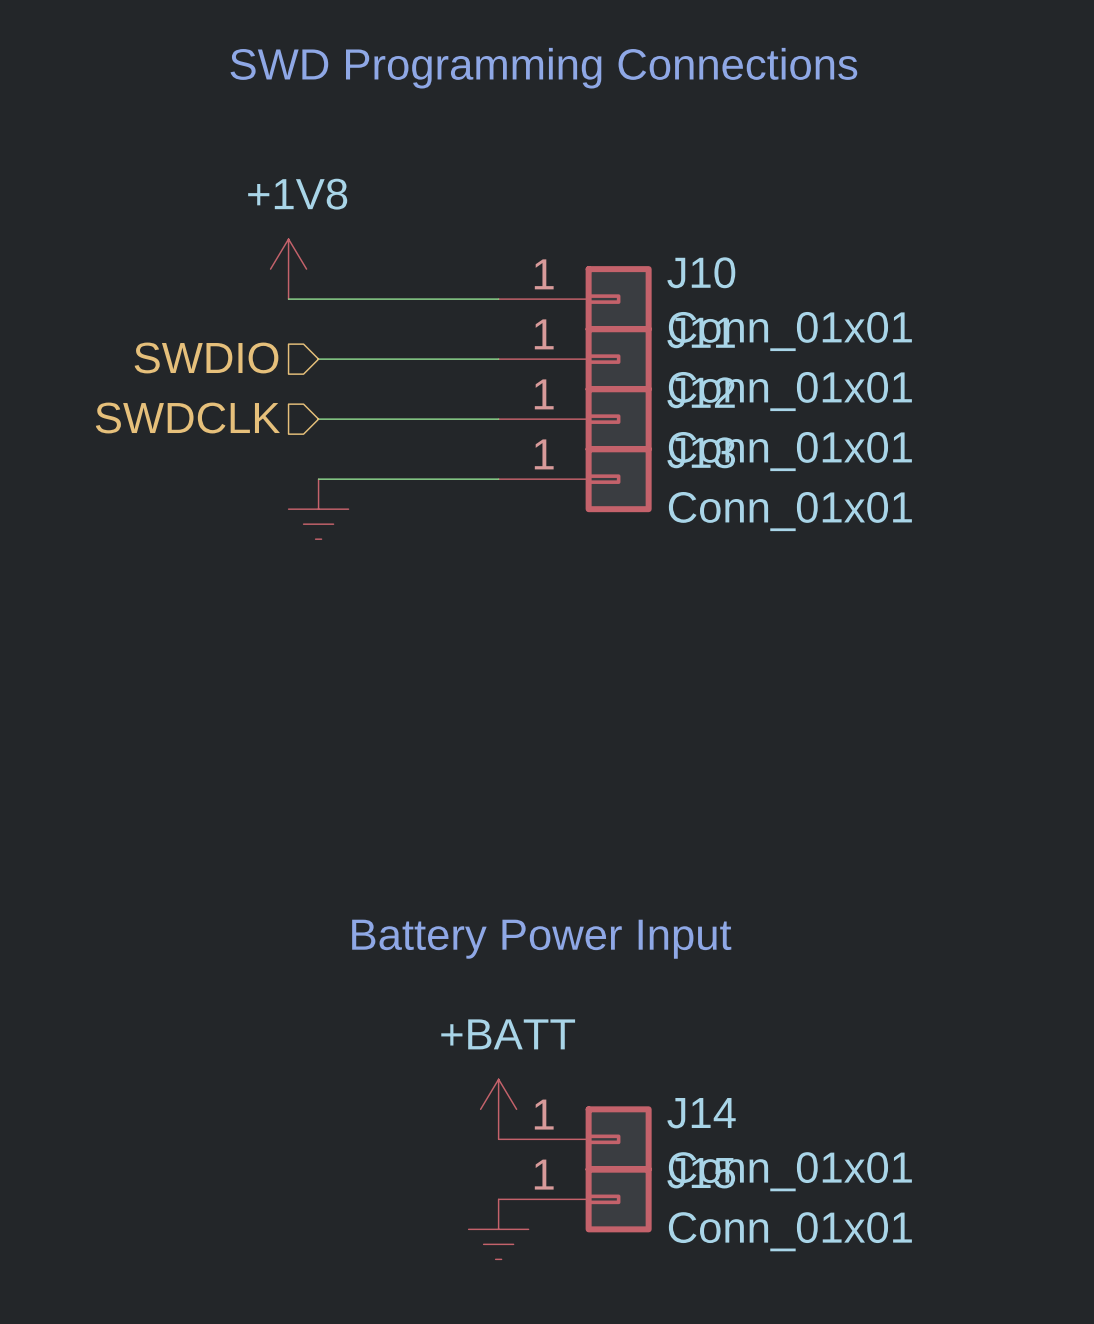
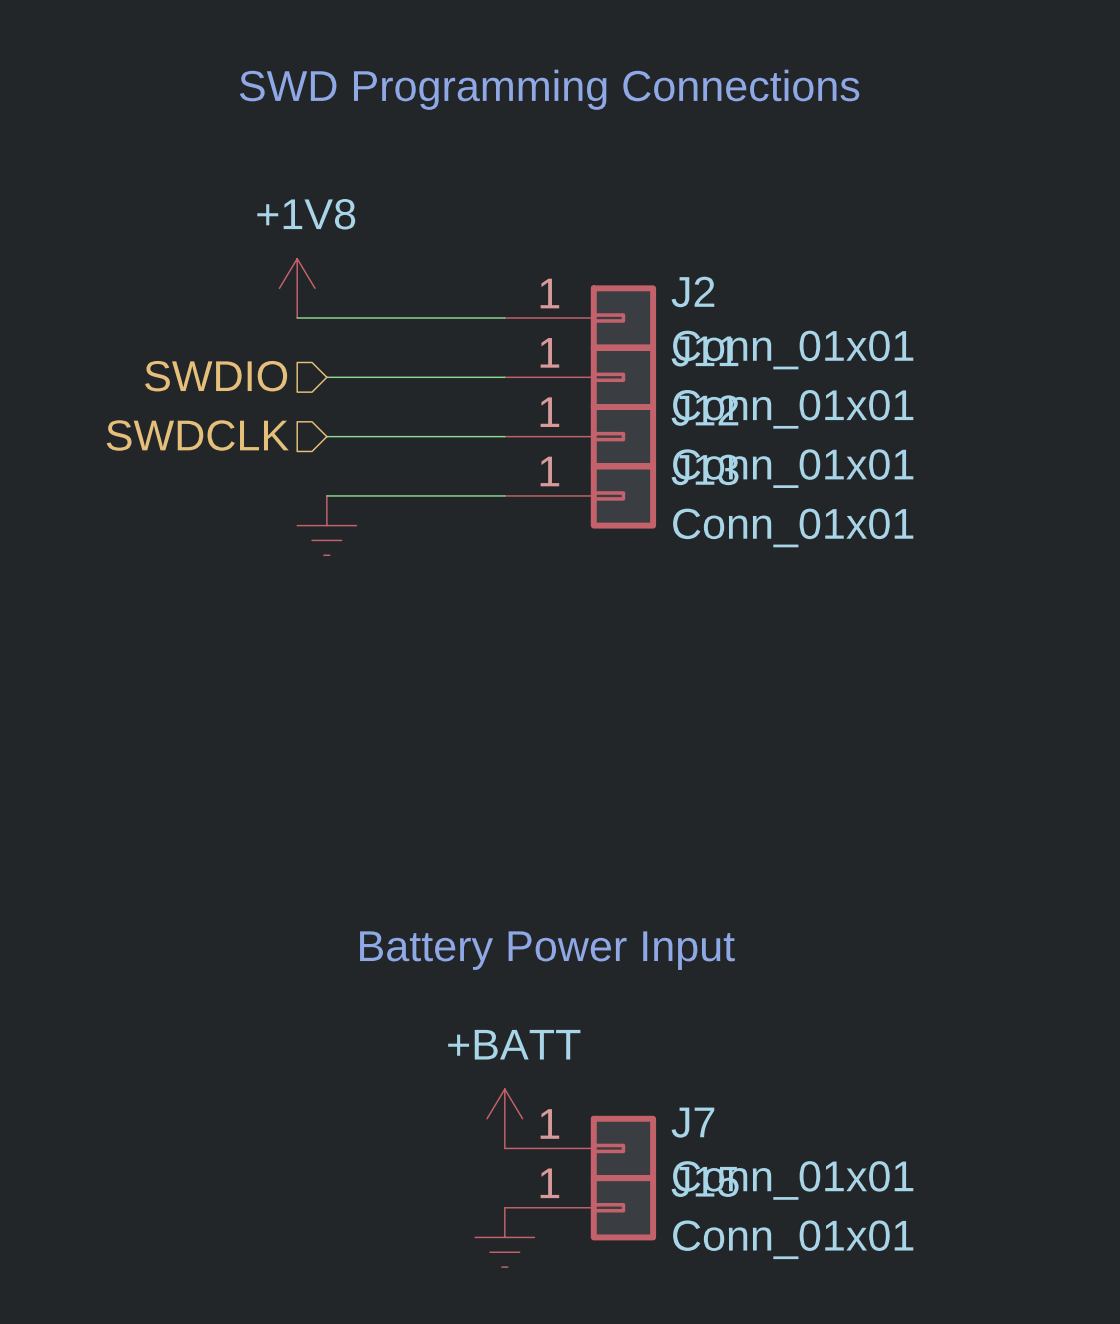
J10 name: J10 (701, 272) -> J2 (692, 291)
J14 name: J14 (701, 1113) -> J7 (692, 1122)

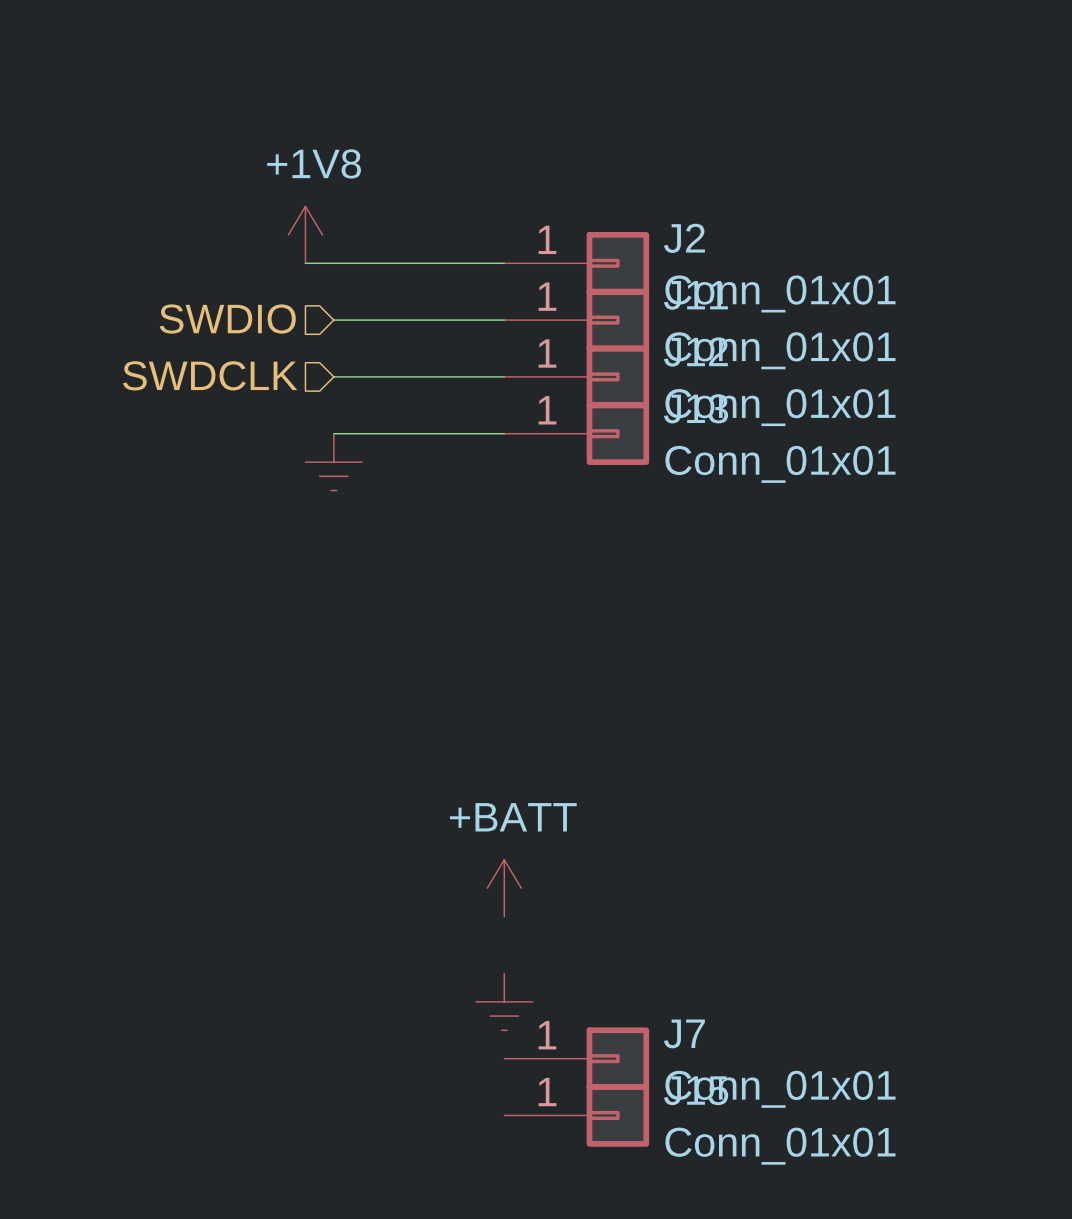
text: SWD Programming Connections (549, 89) -> none
text: Battery Power Input (547, 950) -> none
power symbol position: +BATT (504, 1118) -> +BATT (504, 888)
power symbol position: (504, 1237) -> (504, 1001)

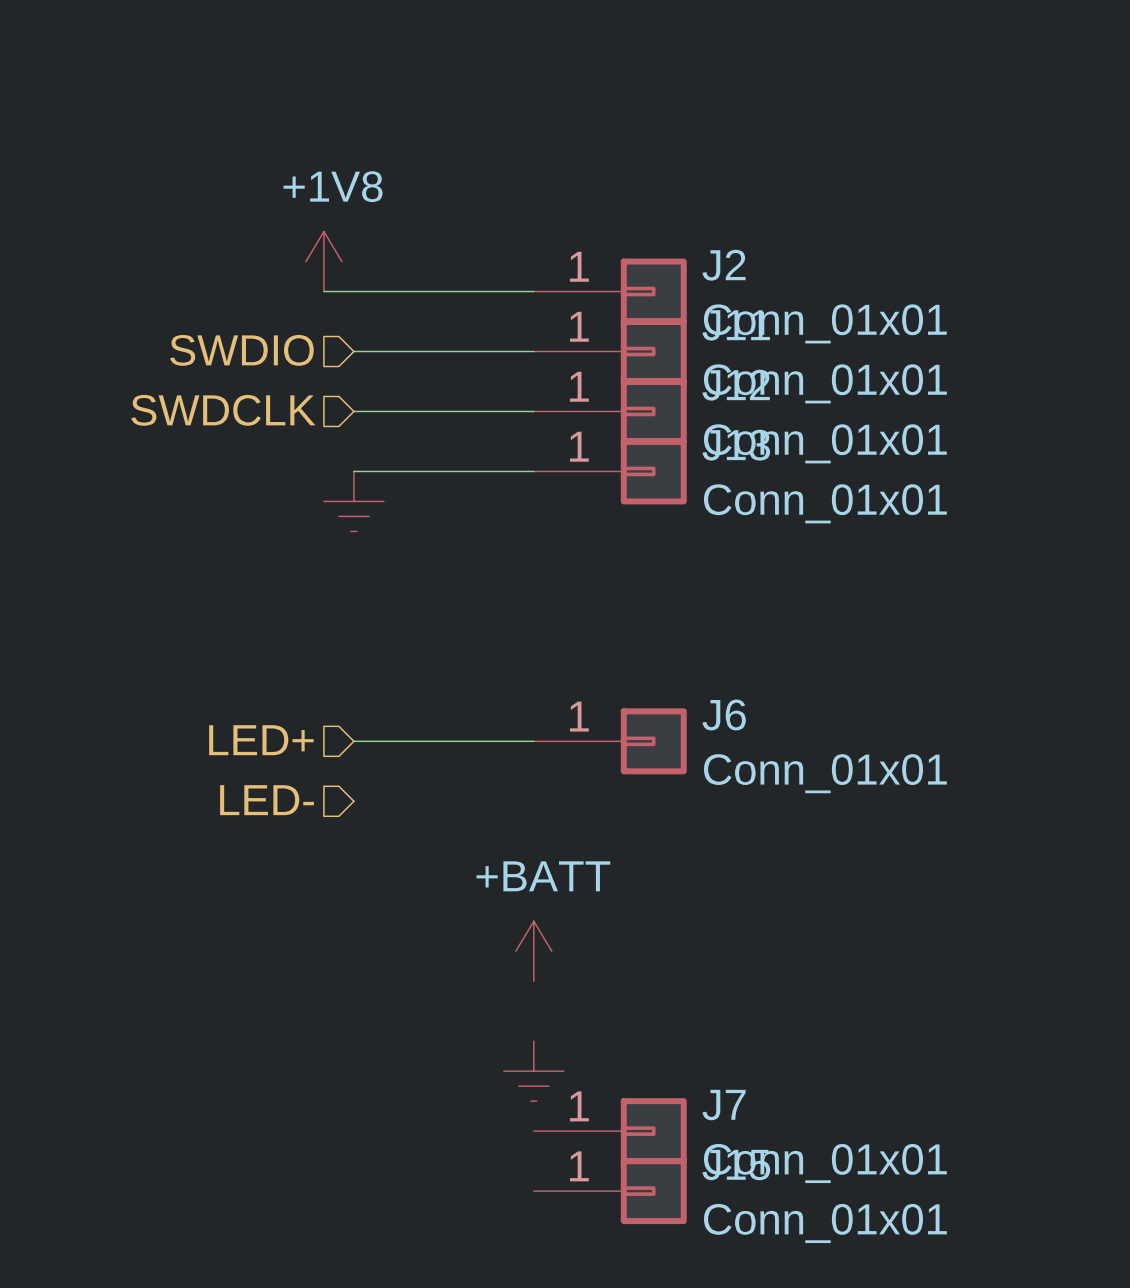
hierarchical label: none -> LED+ (261, 740)
wire: none -> (353, 741) (533, 741)
J6: none -> Conn_01x01 (610, 741)
hierarchical label: none -> LED- (266, 800)

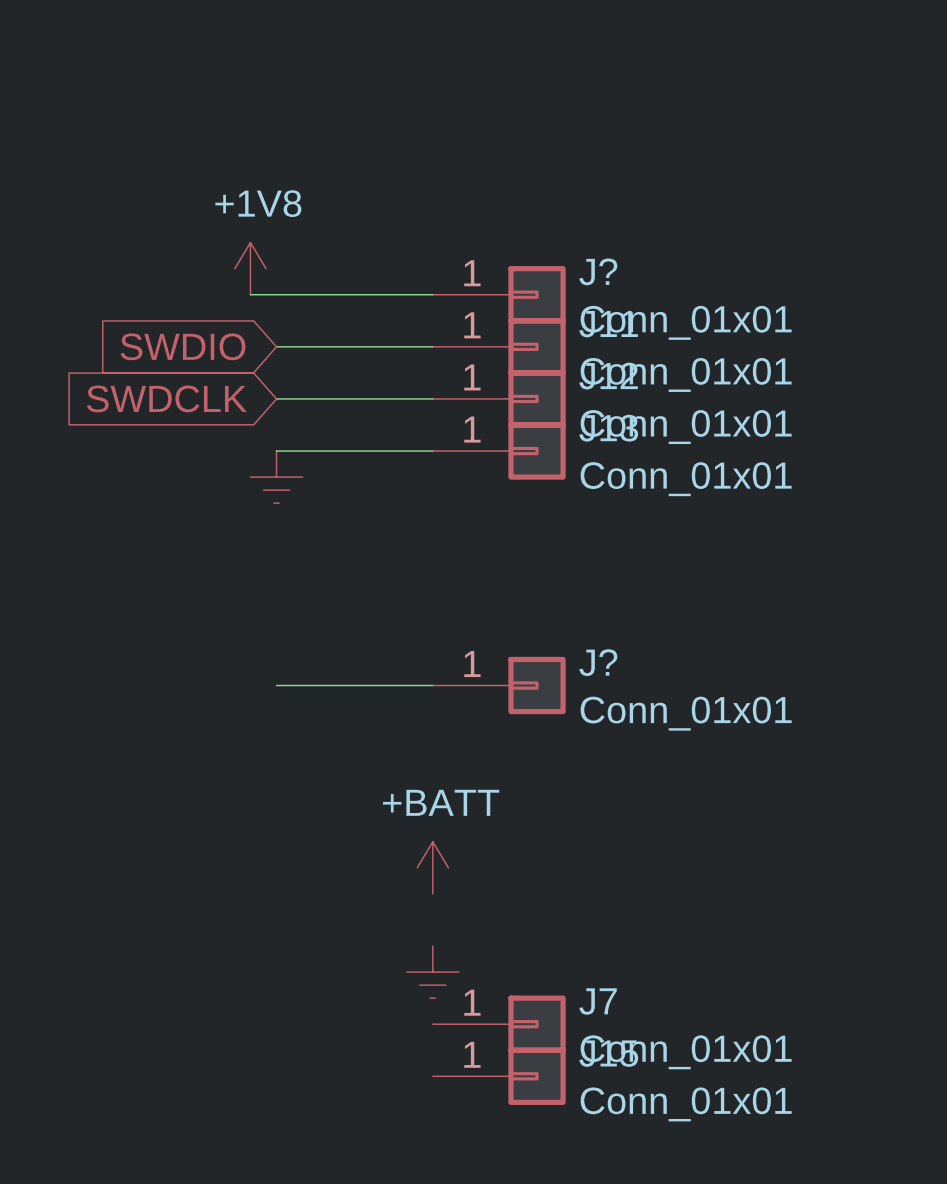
J2 name: J2 (724, 265) -> J? (598, 271)
hierarchical label: SWDIO (241, 350) -> none
global label: none -> SWDIO (182, 346)
hierarchical label: SWDCLK (223, 410) -> none
global label: none -> SWDCLK (166, 398)
J6 name: J6 (724, 715) -> J? (598, 662)
hierarchical label: LED+ (261, 740) -> none
hierarchical label: LED- (266, 800) -> none

